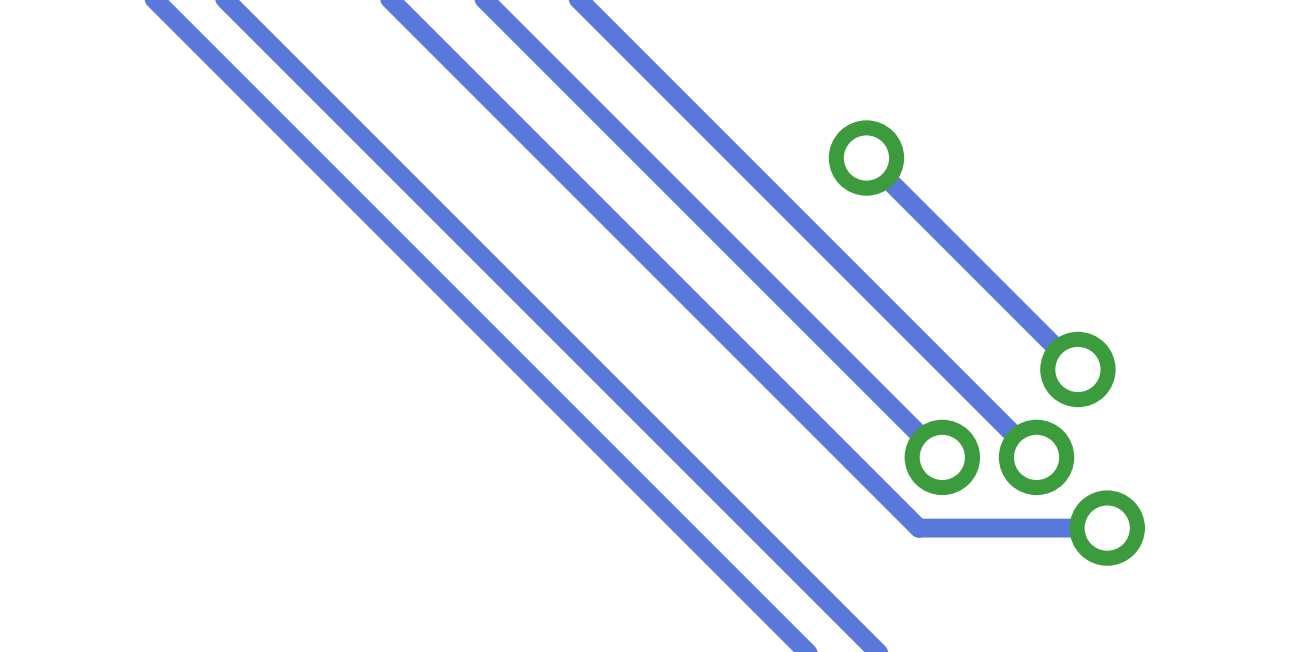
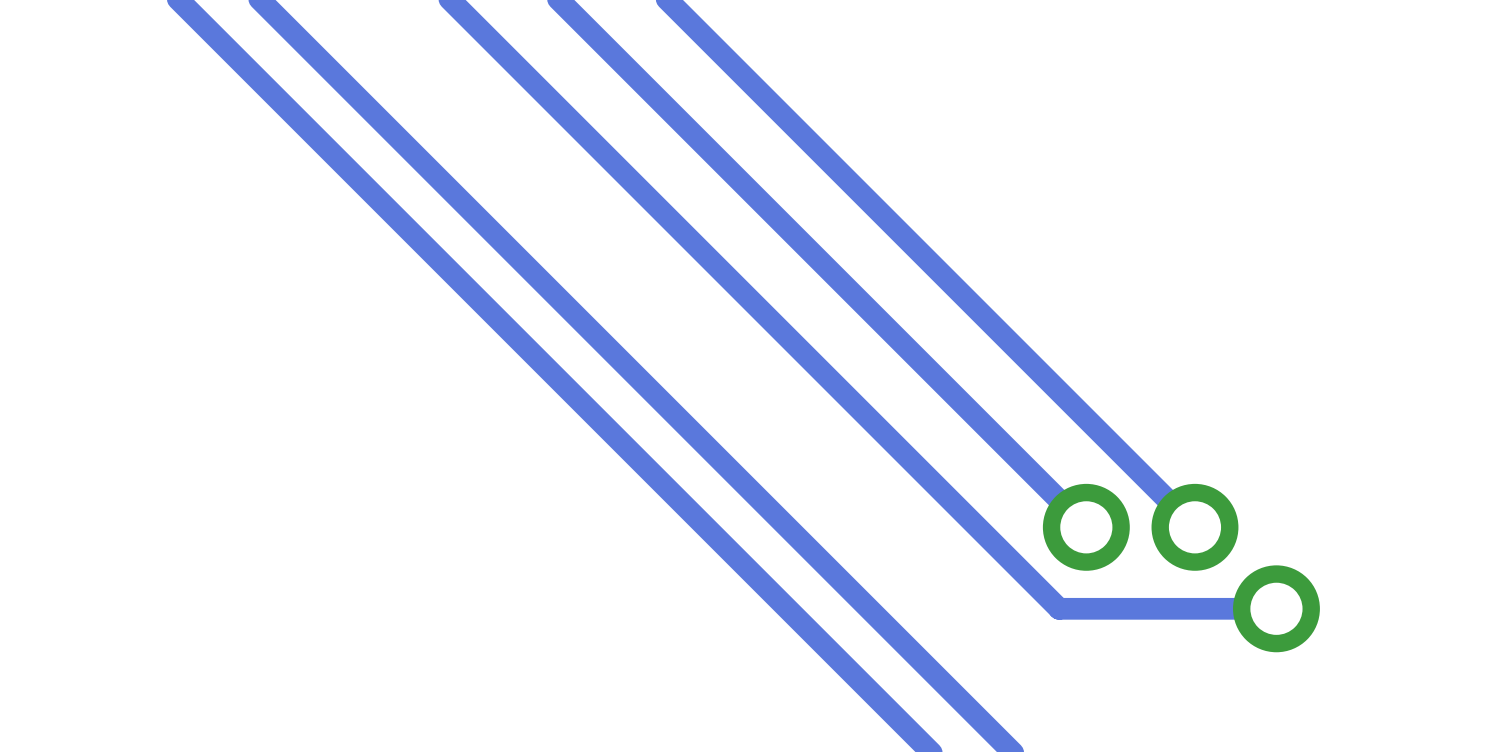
track: (866, 158) (1077, 369) -> none
via: (866, 158) -> none
via: (1077, 369) -> none

